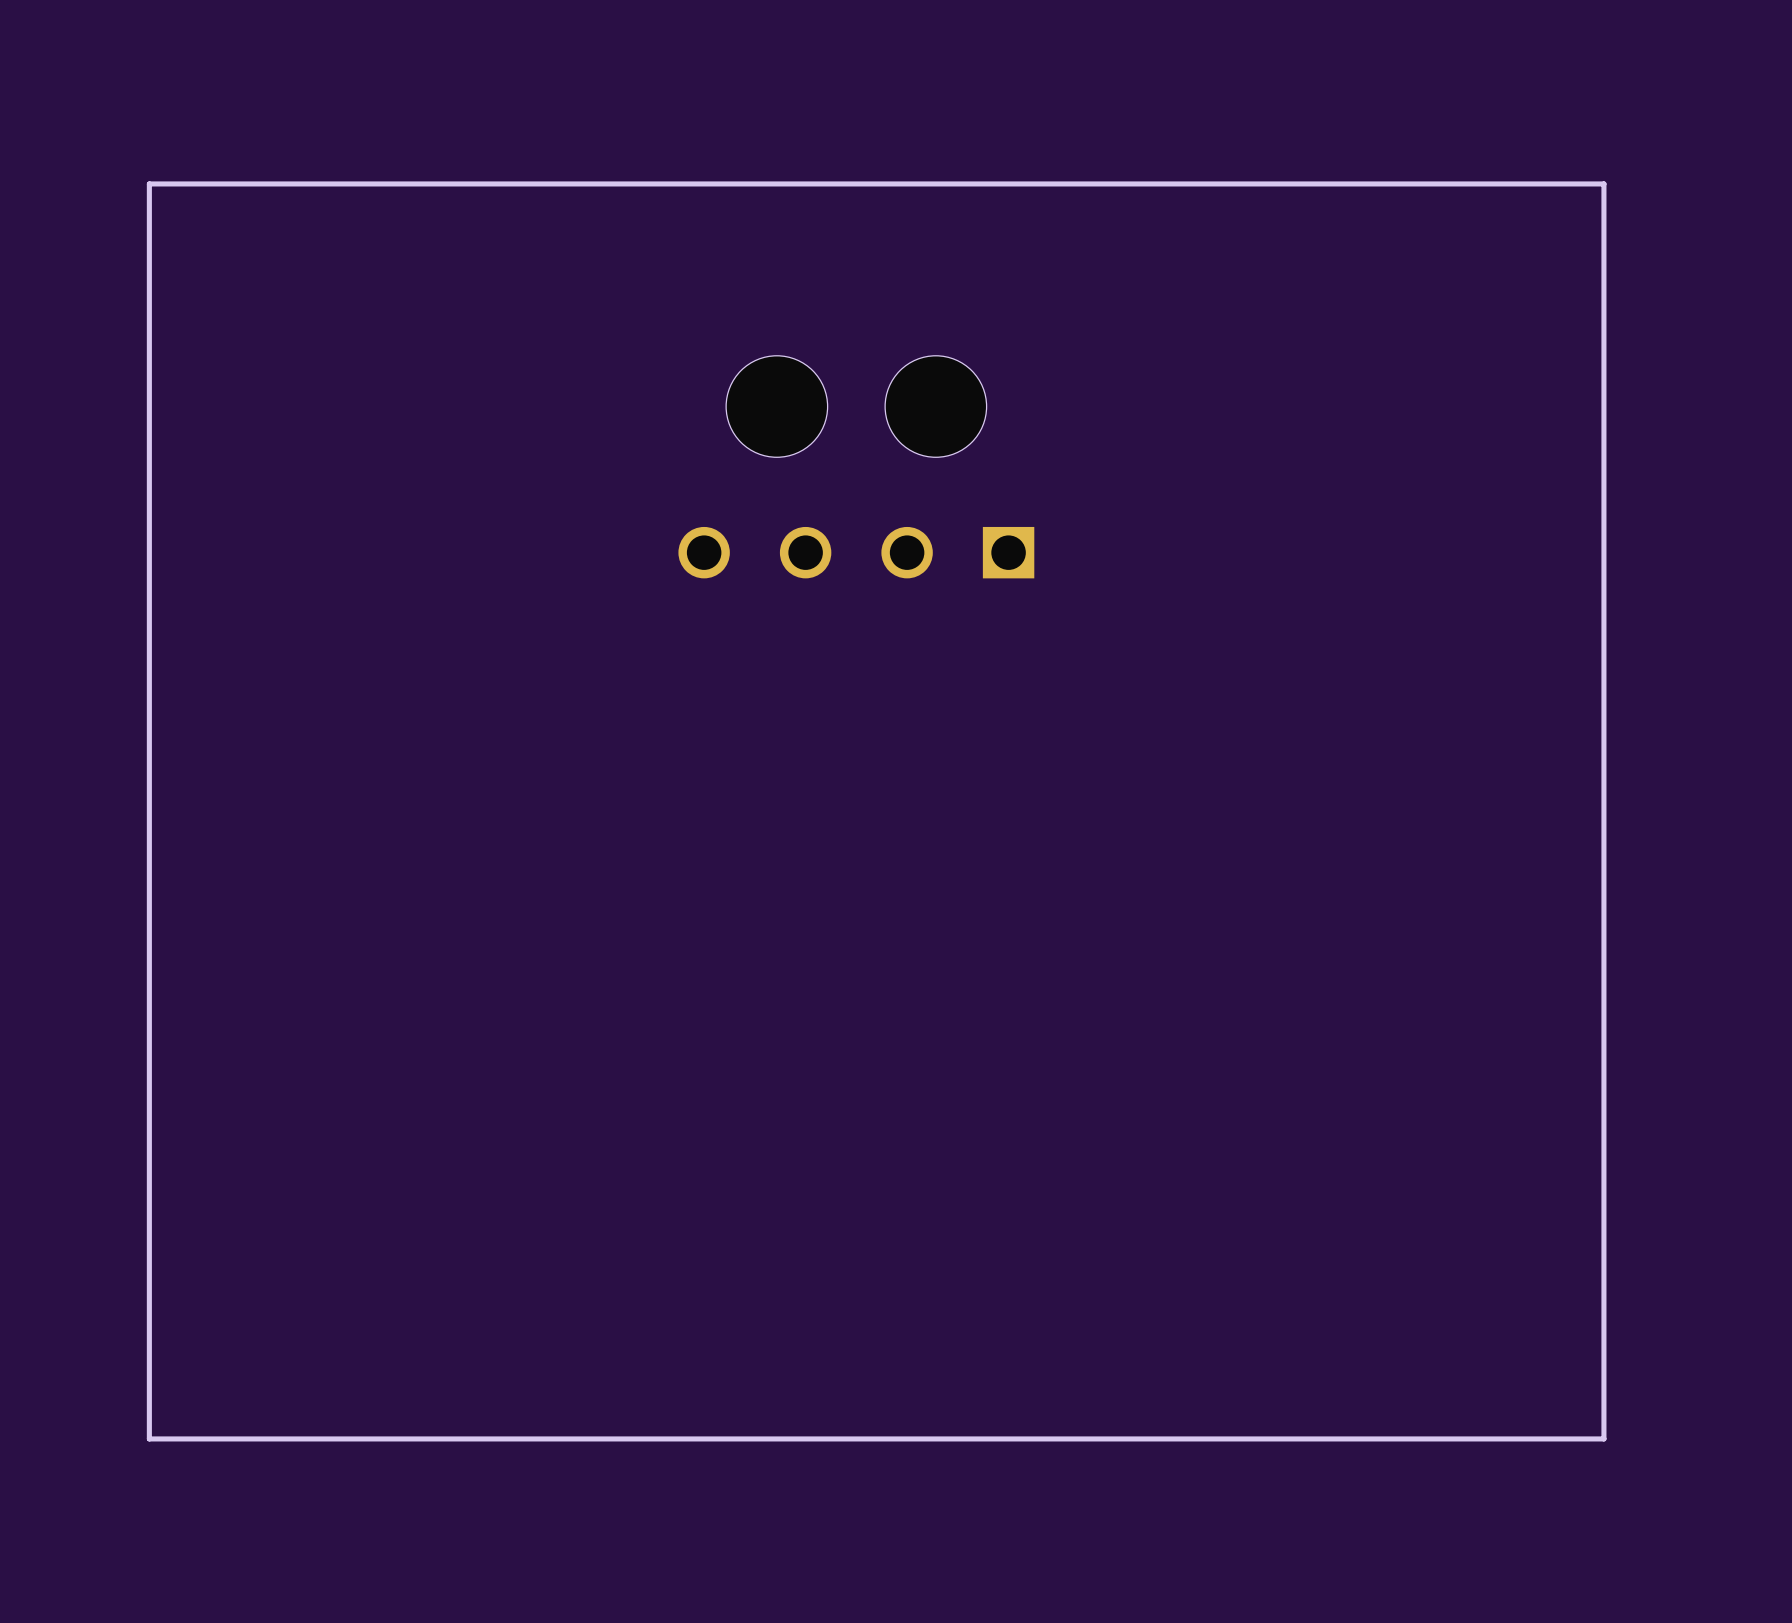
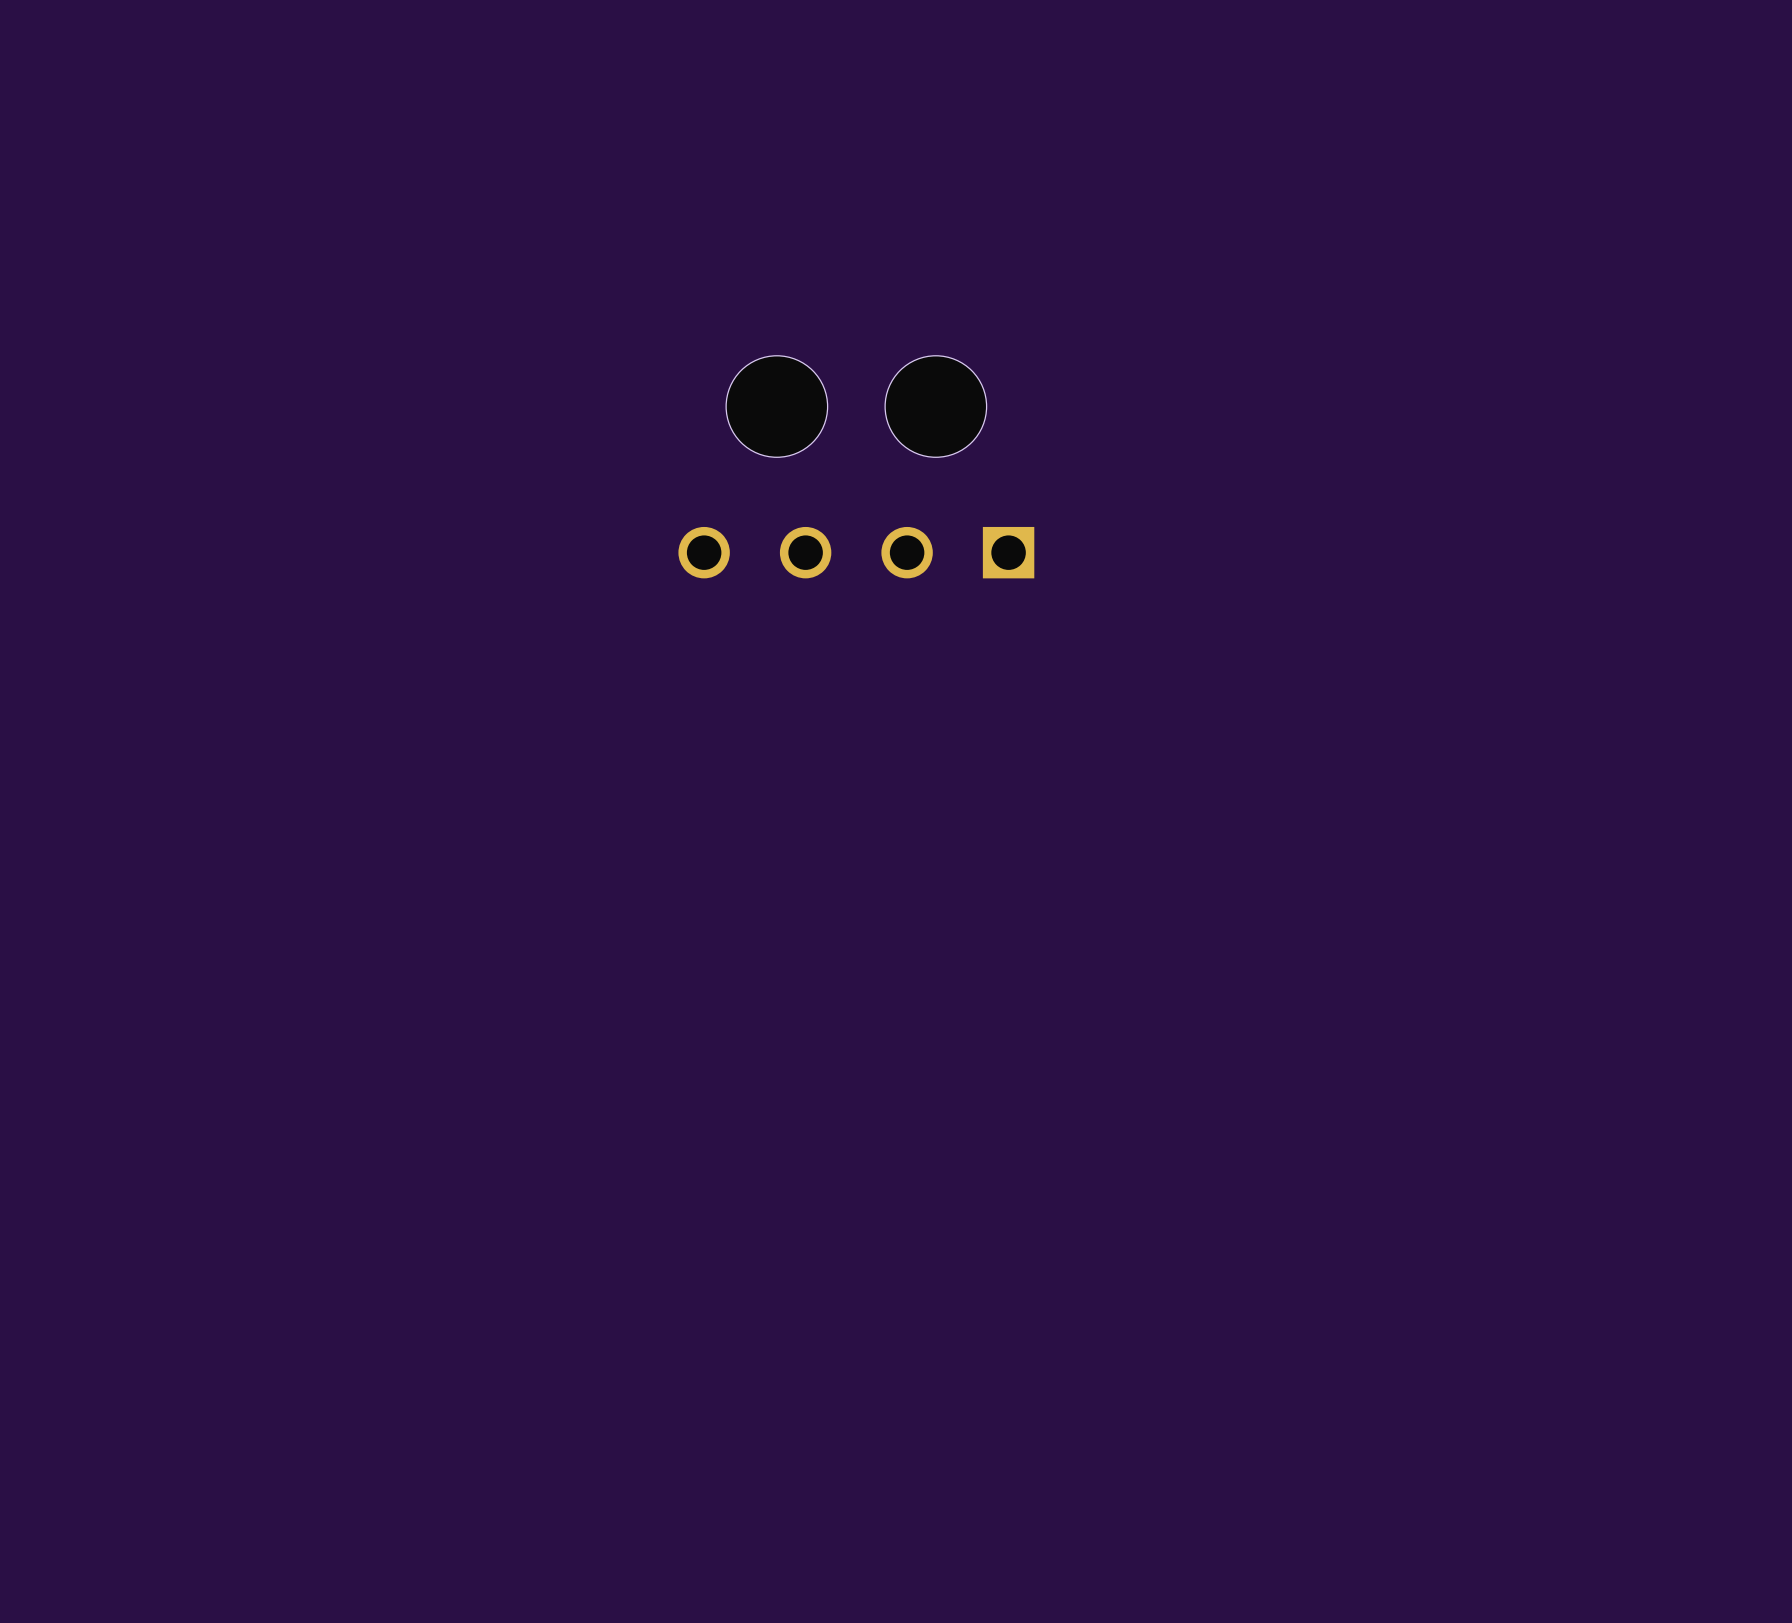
board edge: (1603, 183) (1603, 1438) (149, 1438) (149, 183) (1603, 183) -> none

